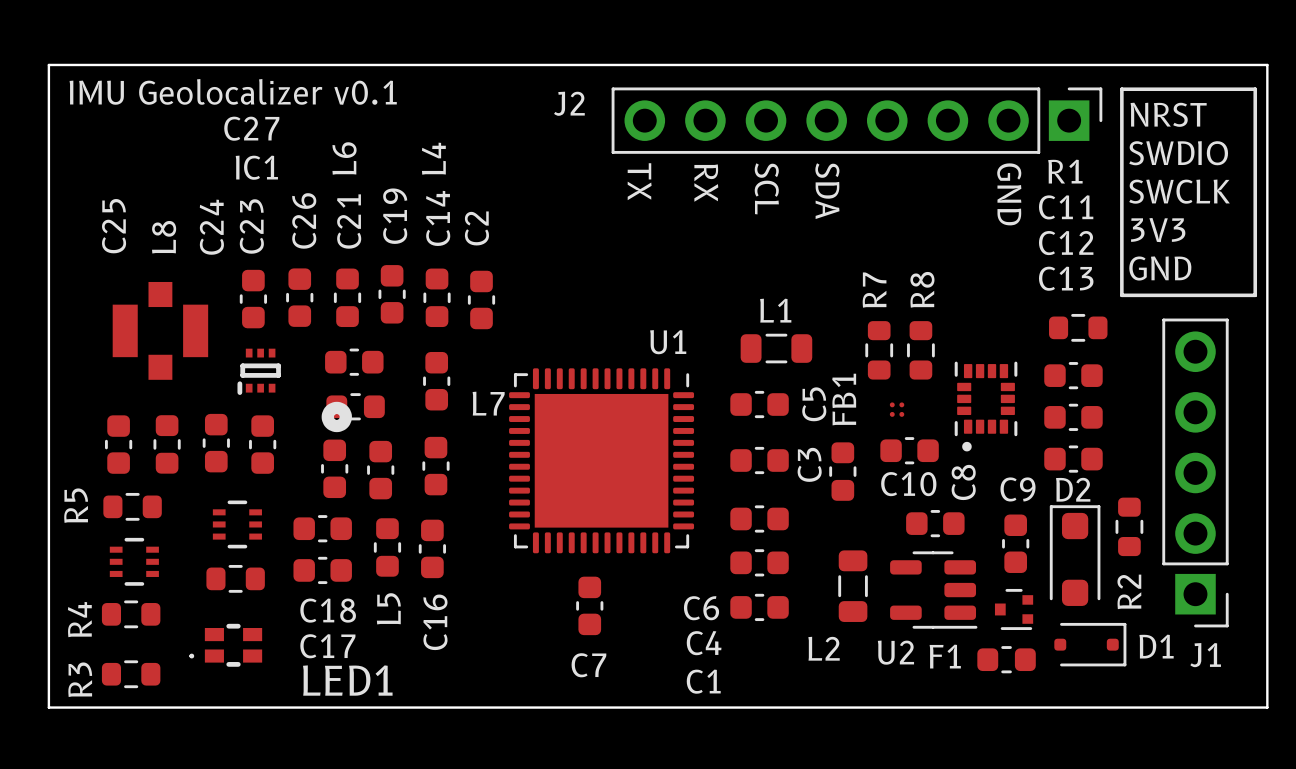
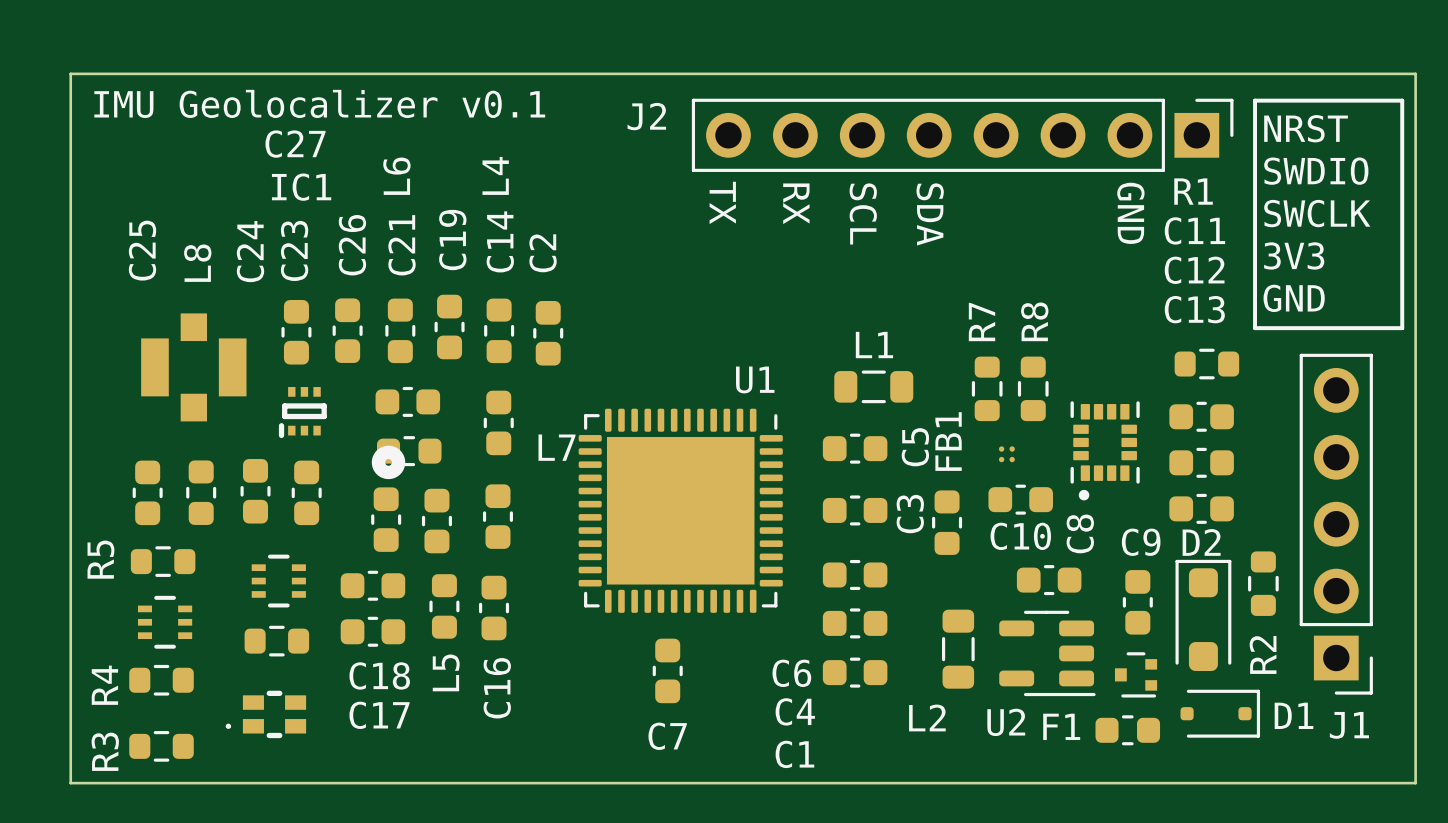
LED1 name: LED1 (347, 680) -> none

